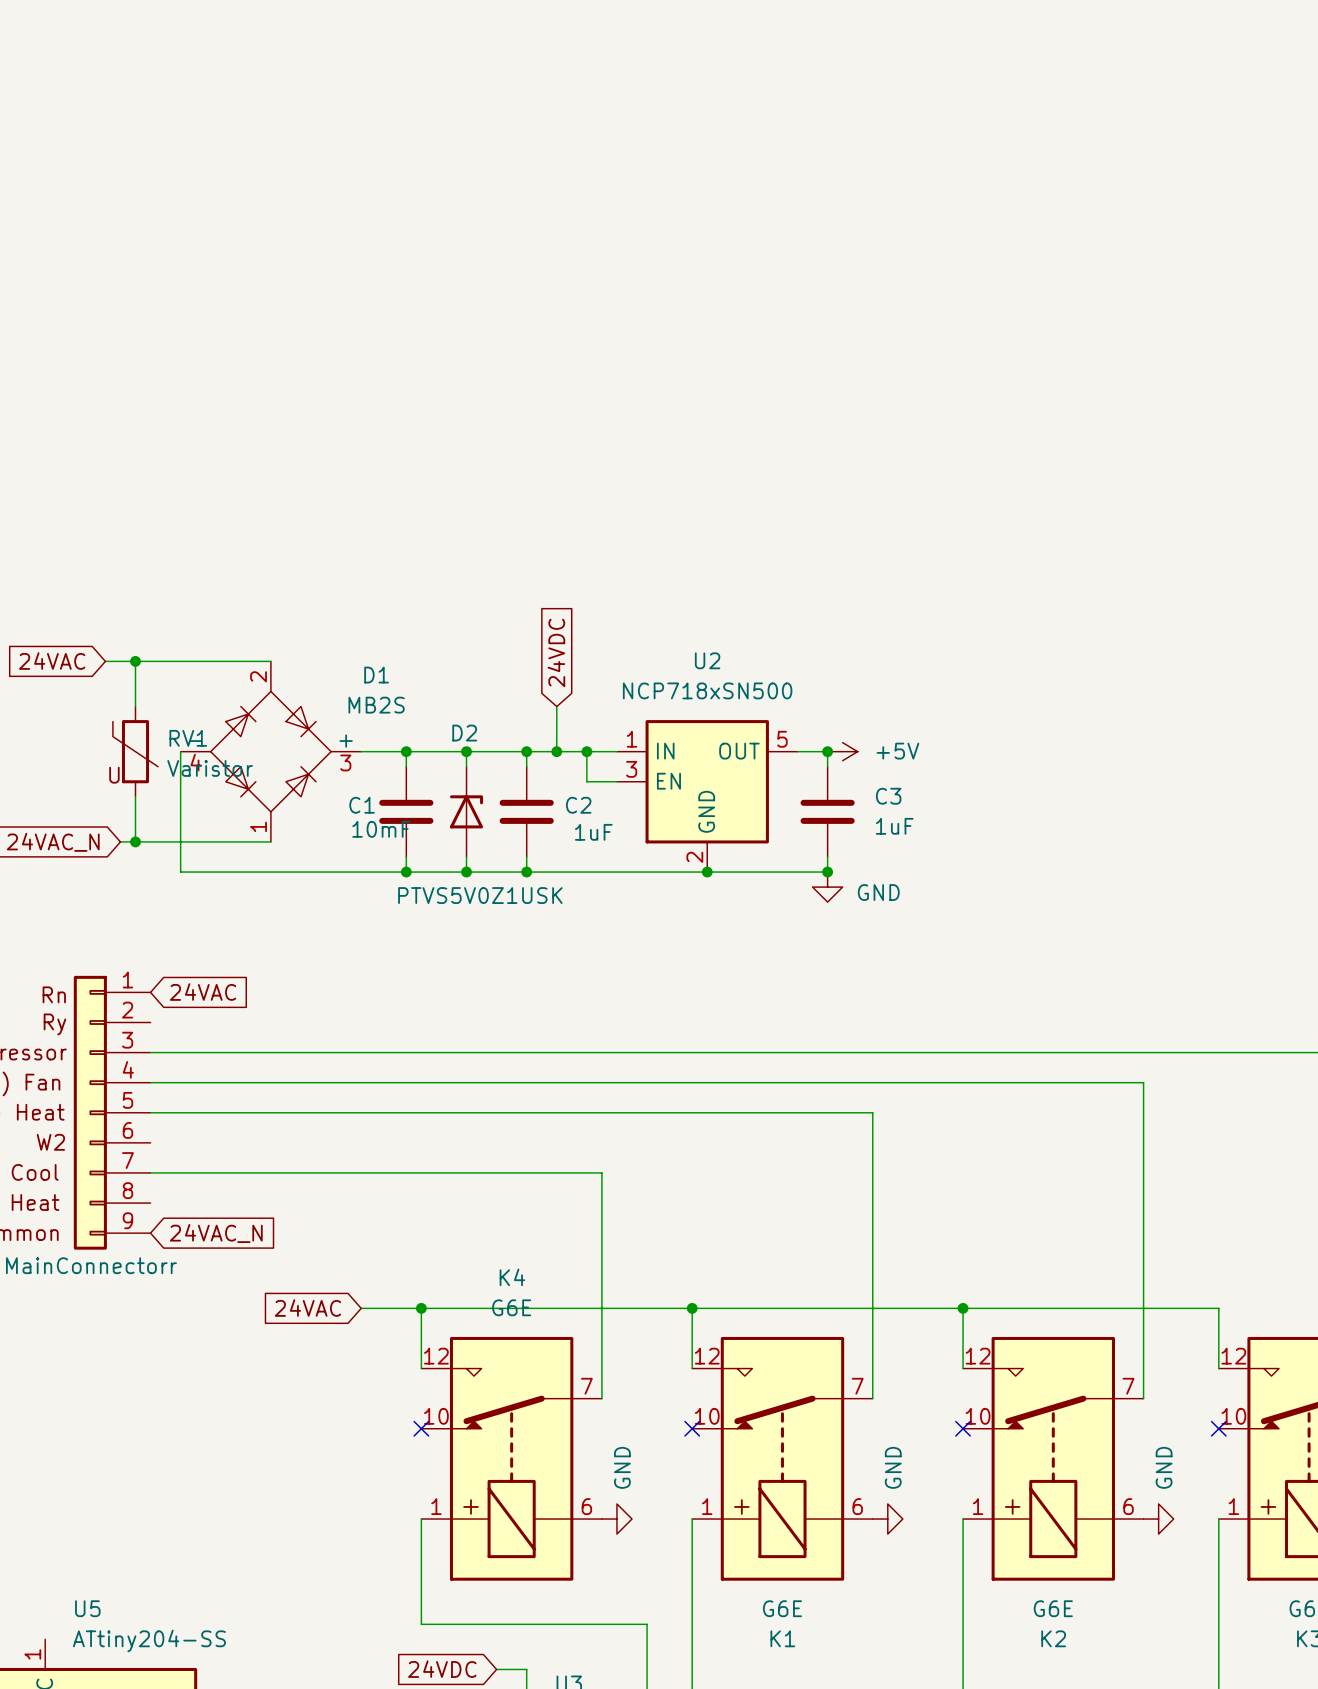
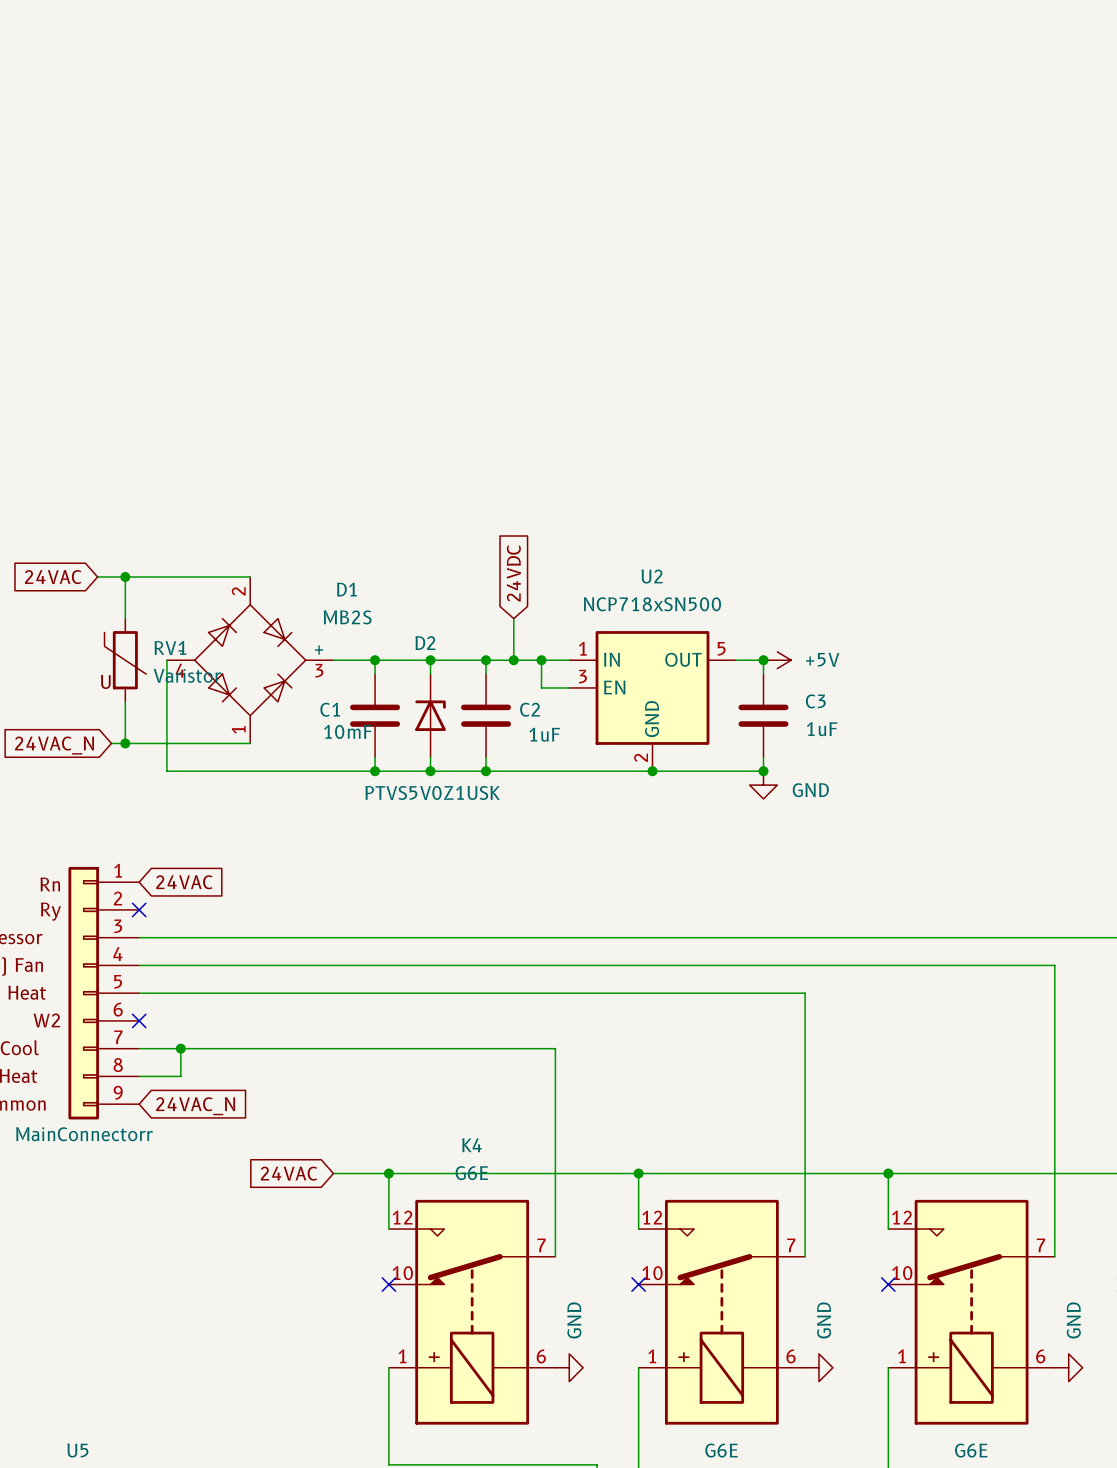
no-connect mark: none -> (139, 909)
no-connect mark: none -> (139, 1020)
wire: none -> (180, 1048) (180, 1076) (139, 1076)
junction: none -> (180, 1048)

